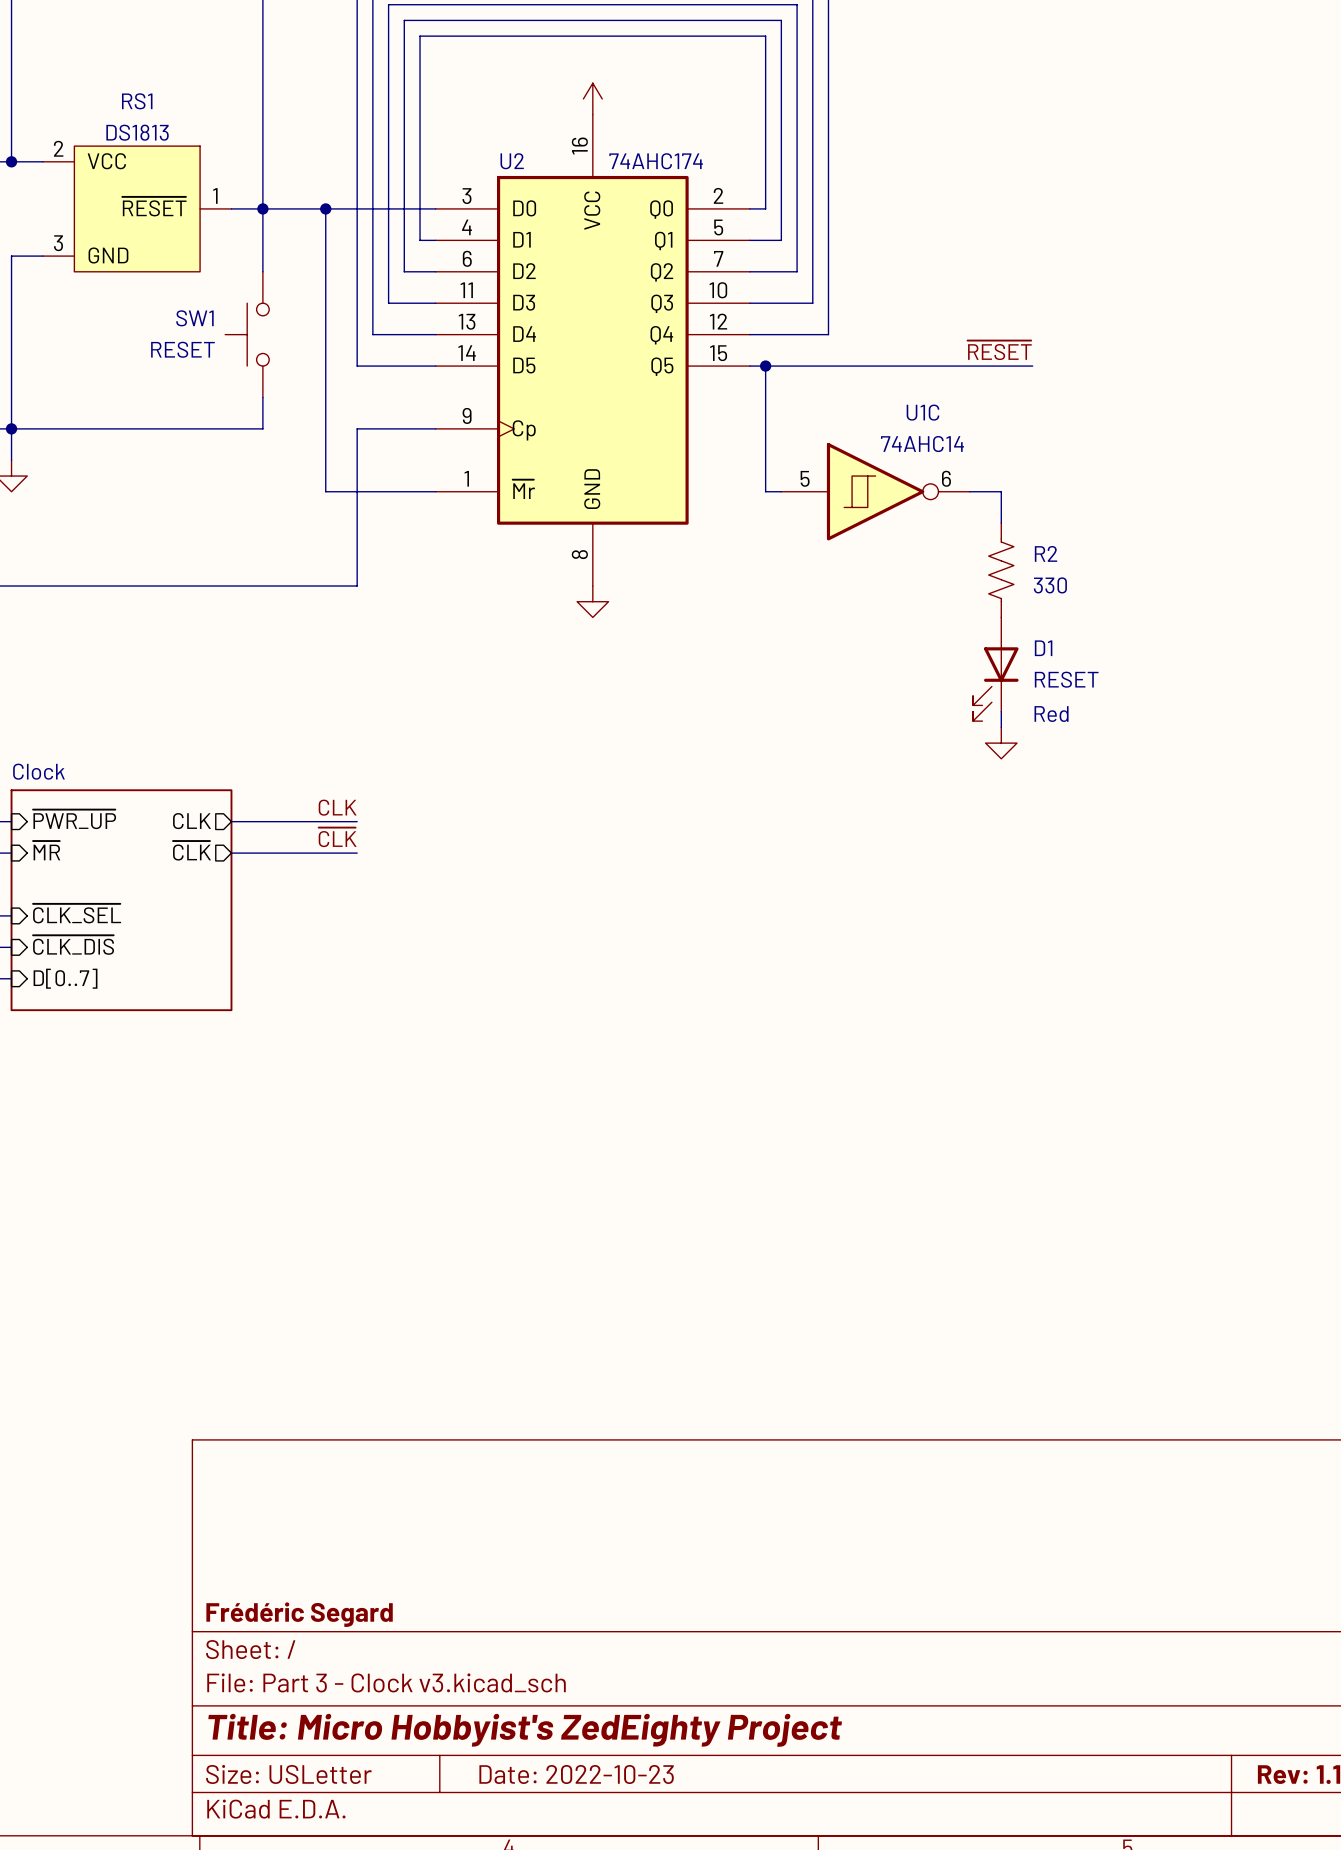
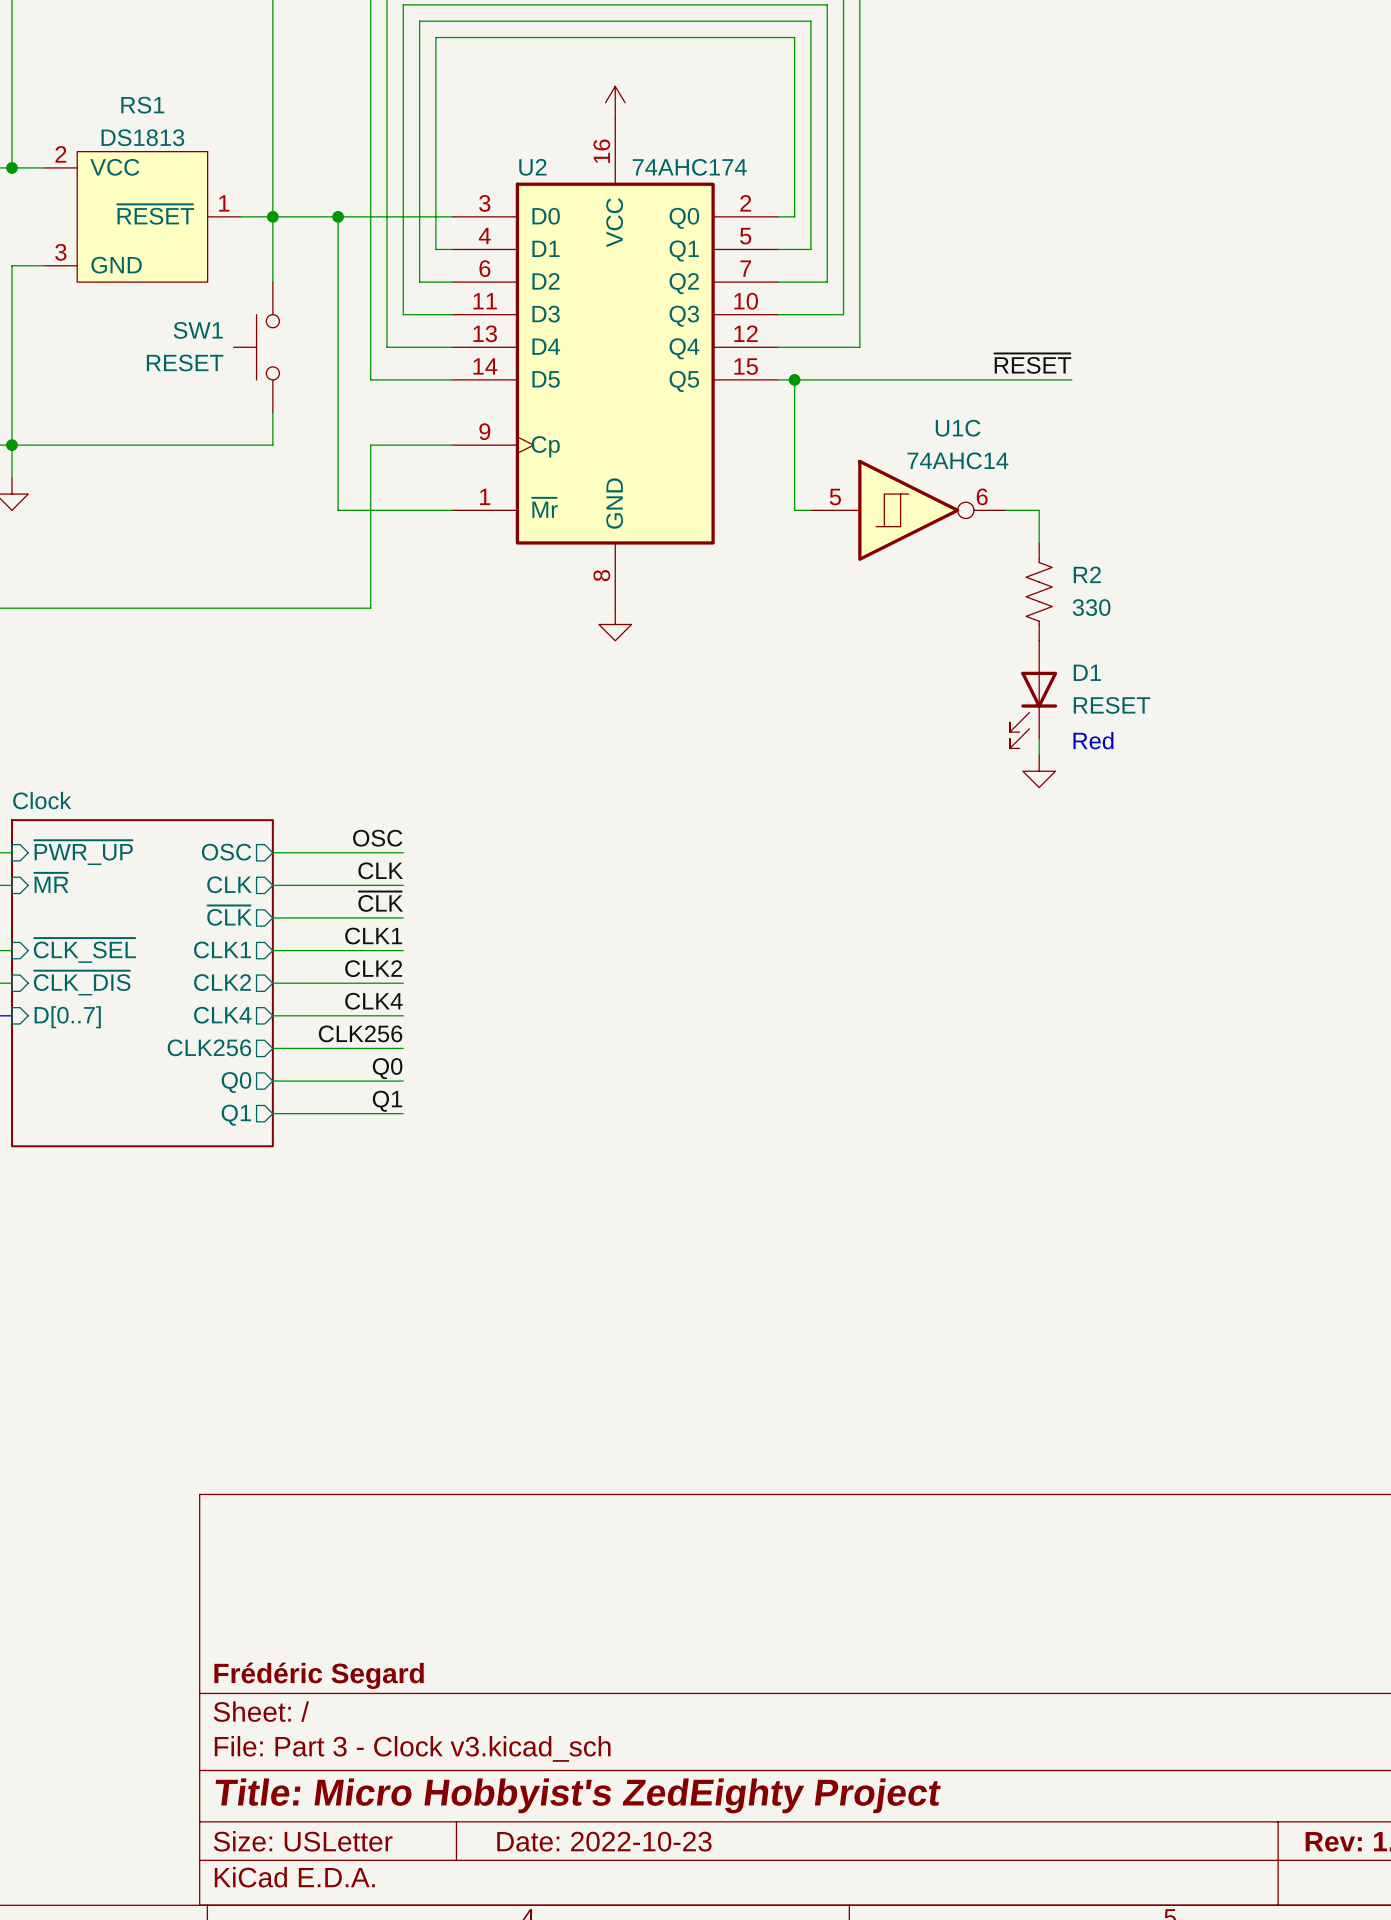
label position: CLK (337, 807) -> CLK (380, 870)
label: none -> OSC (377, 838)
sheet pin position: CLK (191, 821) -> CLK (229, 884)
sheet pin: none -> OSC (226, 852)
wire: (231, 821) (262, 821) -> (370, 852) (403, 852)
label position: ~{CLK} (337, 837) -> ~{CLK} (380, 901)
sheet pin position: ~{CLK} (191, 850) -> ~{CLK} (229, 915)
wire: (231, 853) (262, 853) -> (370, 885) (403, 885)
wire: none -> (272, 917) (403, 917)
sheet Clock: (121, 900) -> none
label: none -> CLK1 (373, 936)
sheet pin: none -> CLK1 (222, 949)
wire: none -> (272, 950) (403, 950)
label: none -> CLK2 (373, 968)
sheet pin: none -> CLK2 (222, 982)
sheet Clock: none -> (142, 983)
wire: none -> (272, 983) (403, 983)
label: none -> CLK4 (373, 1001)
sheet pin: none -> CLK4 (222, 1015)
wire: none -> (272, 1015) (403, 1015)
label: none -> CLK256 (360, 1033)
sheet pin: none -> CLK256 (209, 1047)
wire: none -> (272, 1048) (403, 1048)
label: none -> Q0 (387, 1068)
wire: none -> (272, 1081) (403, 1081)
sheet pin: none -> Q0 (236, 1082)
label: none -> Q1 (387, 1101)
sheet pin: none -> Q1 (236, 1115)
wire: none -> (272, 1113) (403, 1113)

